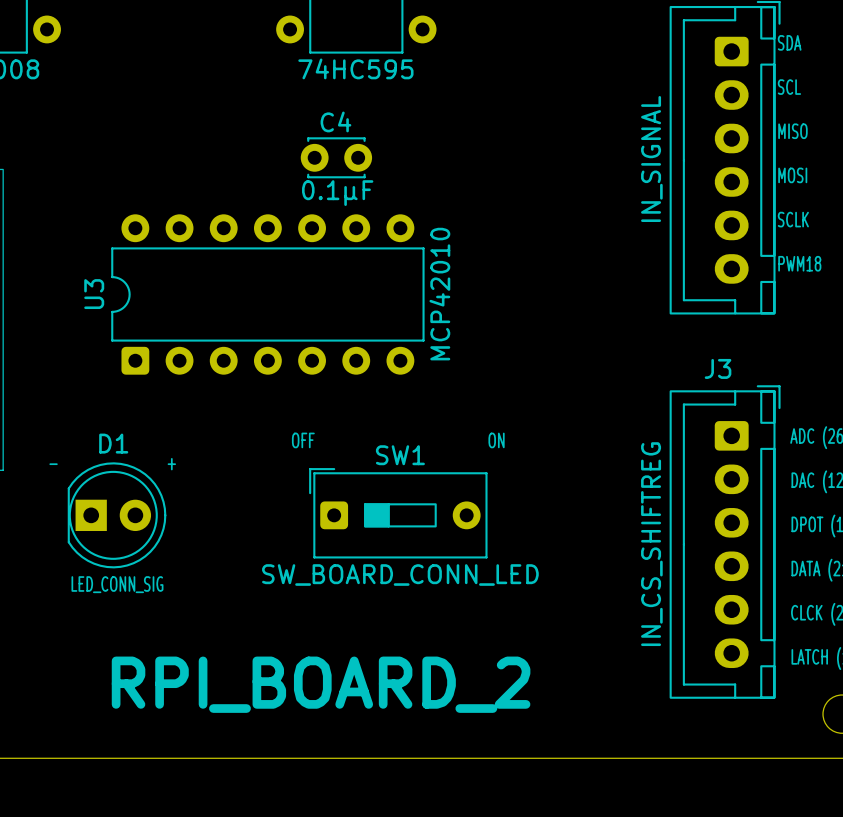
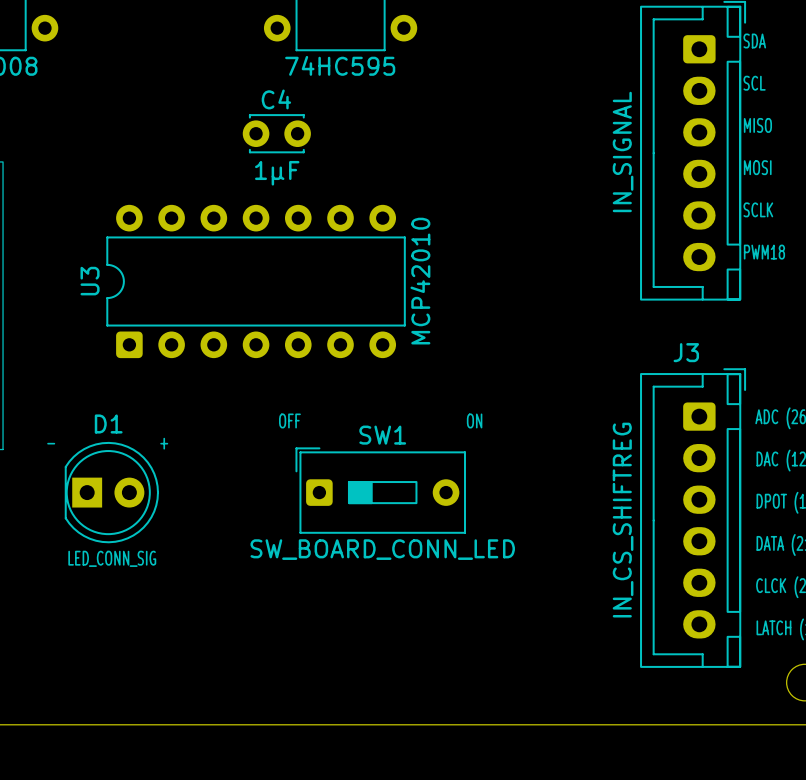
C4 position: (336, 157) -> (276, 133)
C4 value: 0.1µF (337, 193) -> 1µF (277, 173)
text: RPI_BOARD_2 (321, 684) -> none

